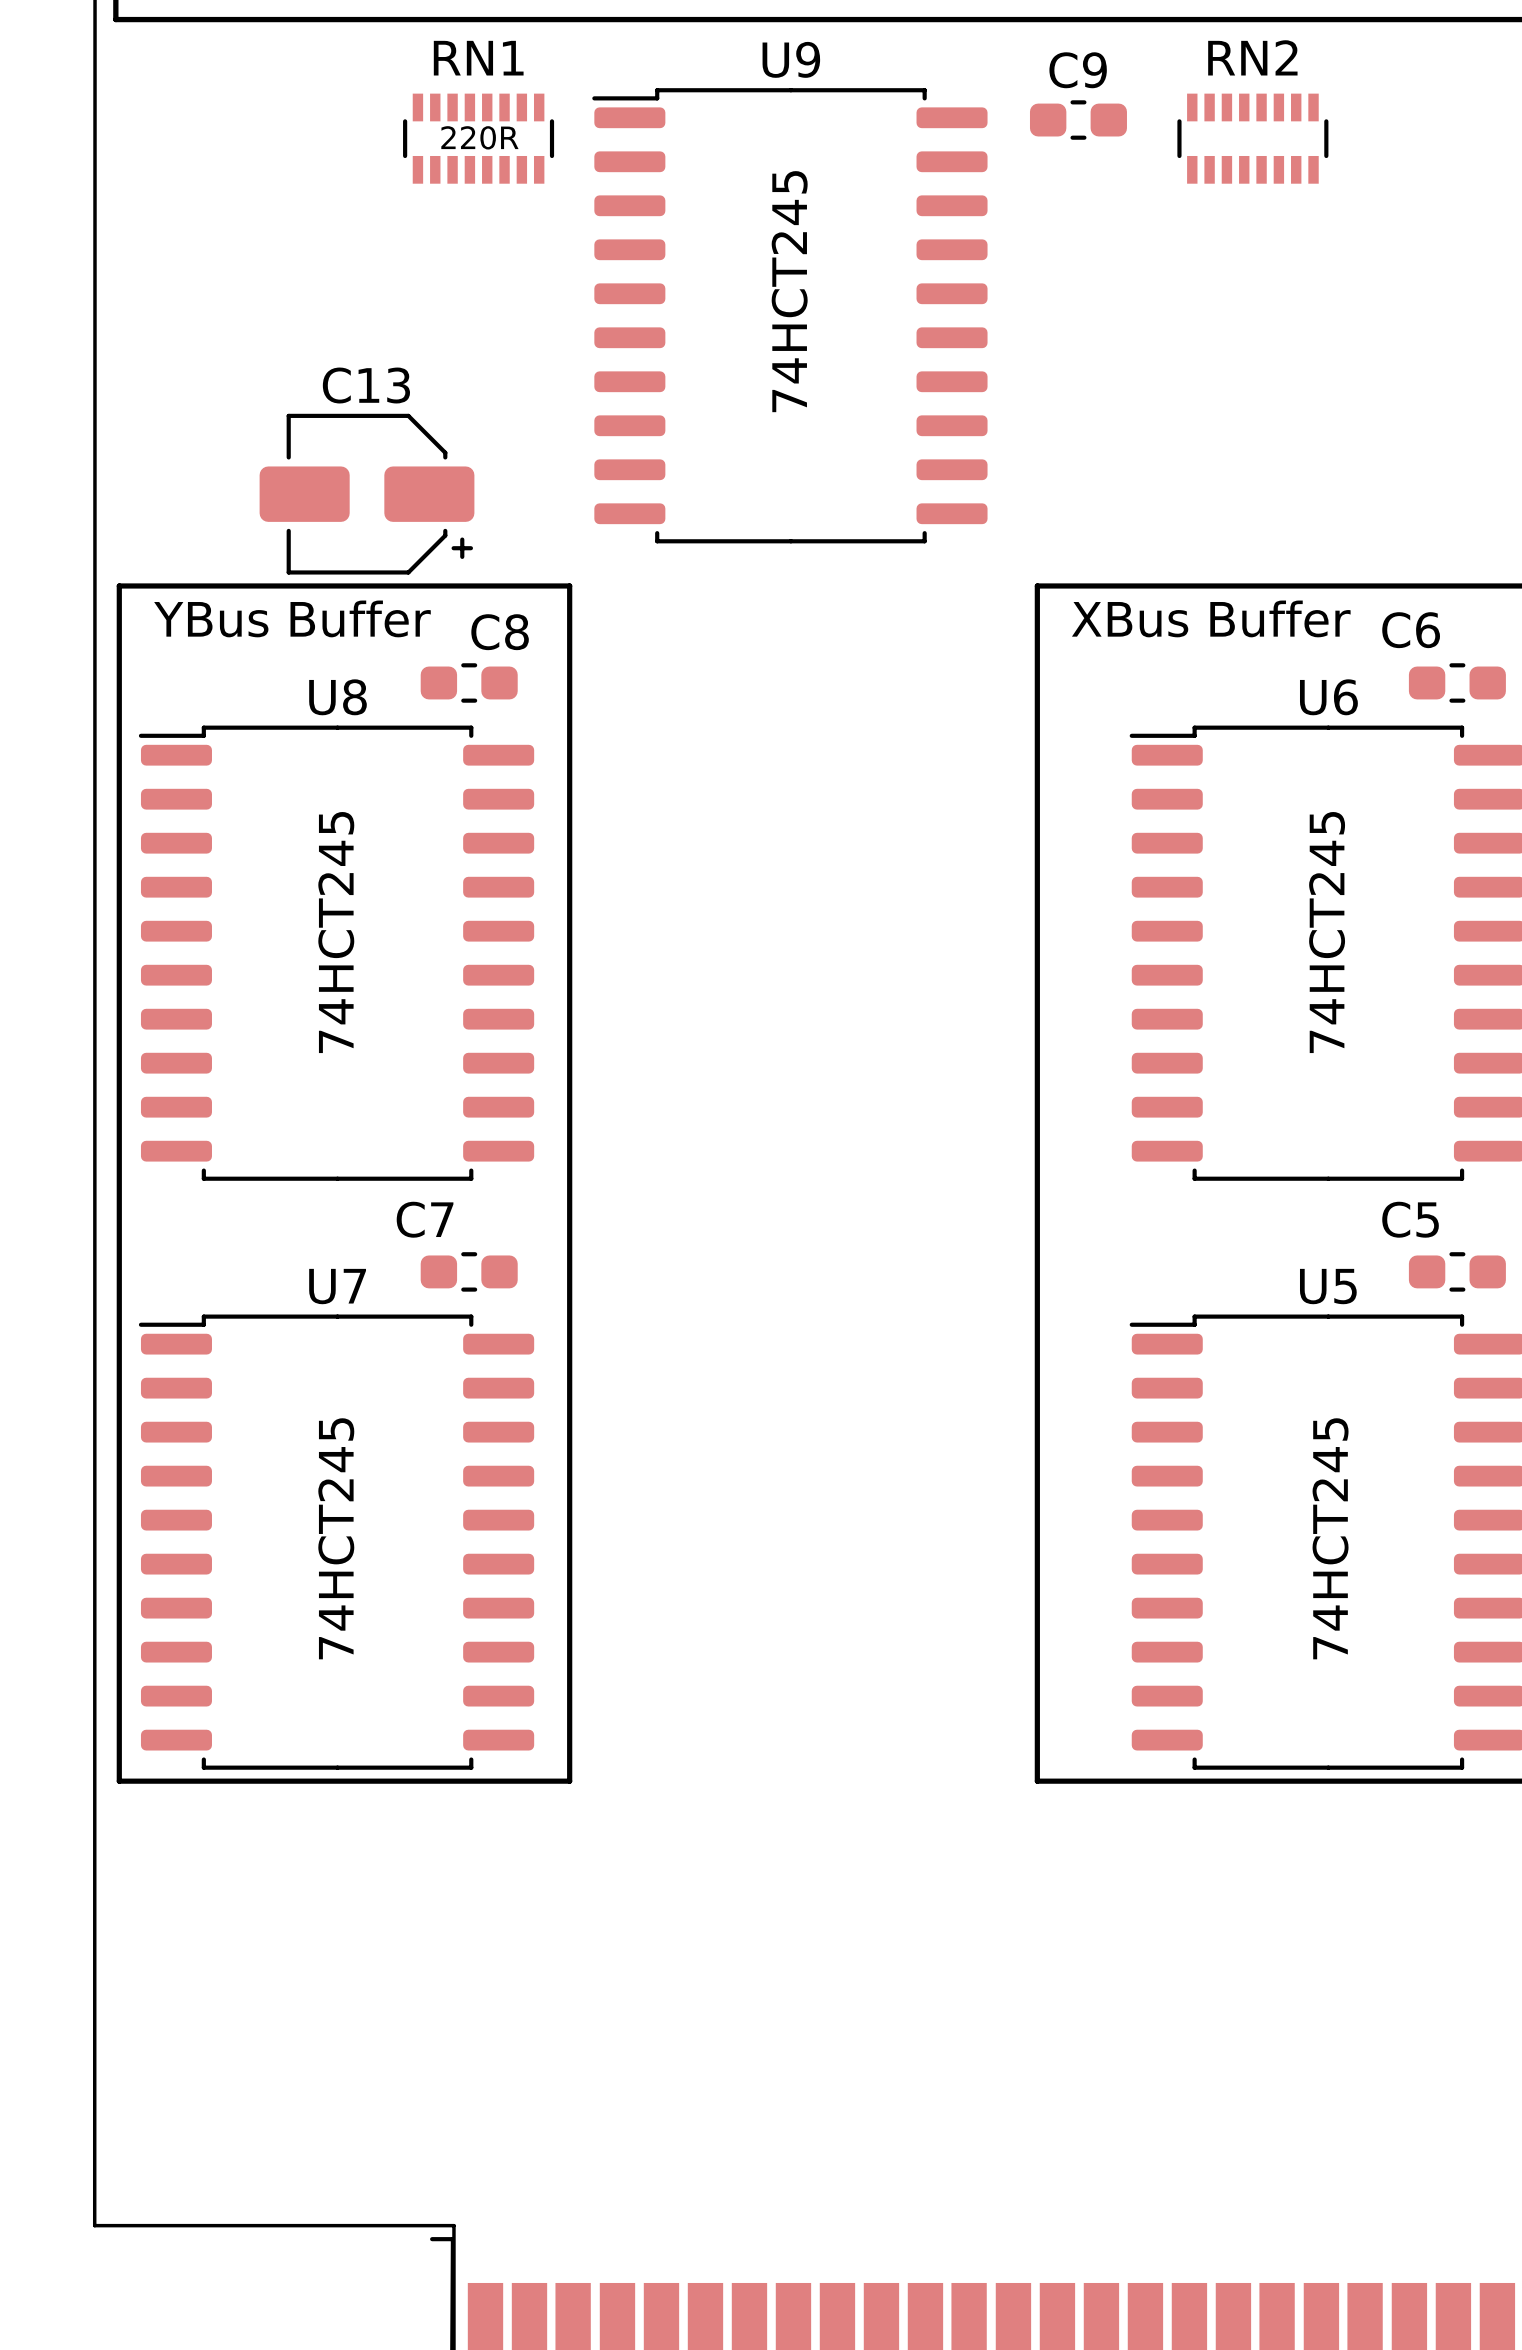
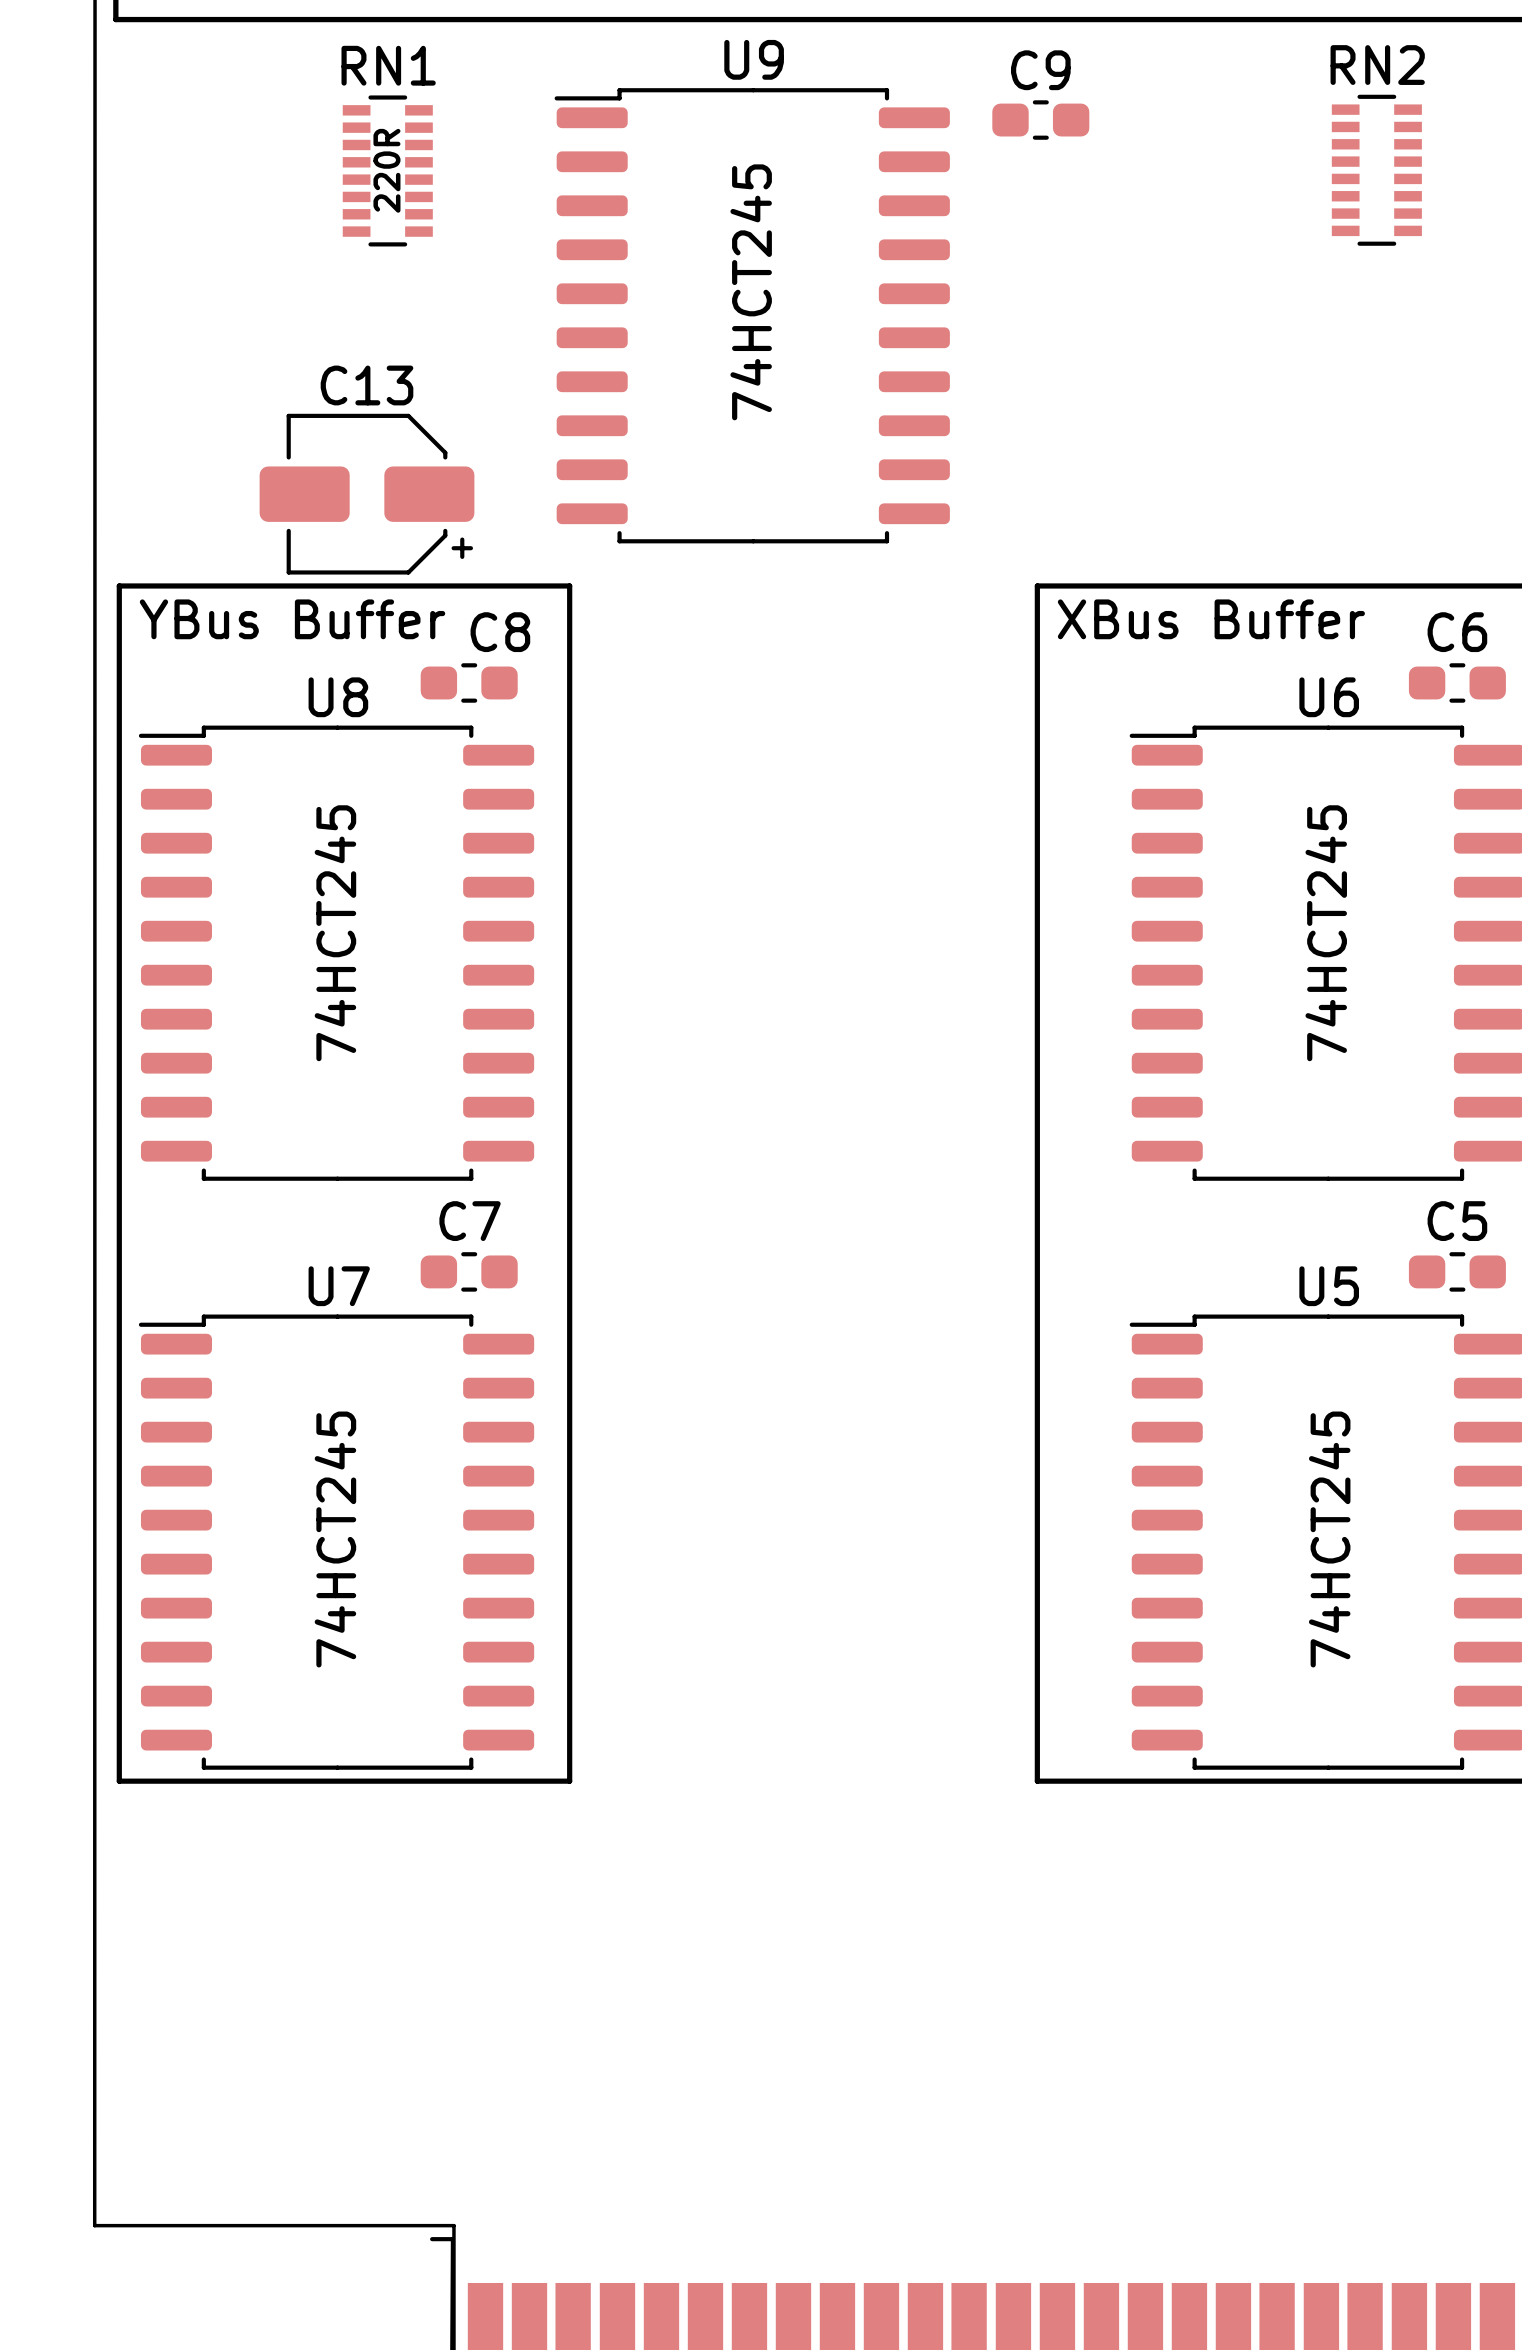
C9 position: (1078, 120) -> (1040, 120)
RN1 rotation: 0° (478, 138) -> 90° clockwise (387, 170)
RN1 position: (478, 138) -> (387, 170)
RN2 rotation: 0° (1252, 138) -> 90° clockwise (1376, 170)
RN2 position: (1252, 138) -> (1376, 170)
U9 position: (789, 315) -> (752, 315)
C6 name position: C6 (1411, 630) -> C6 (1457, 632)
C7 name position: C7 (425, 1219) -> C7 (470, 1221)
C5 name position: C5 (1410, 1219) -> C5 (1457, 1221)

